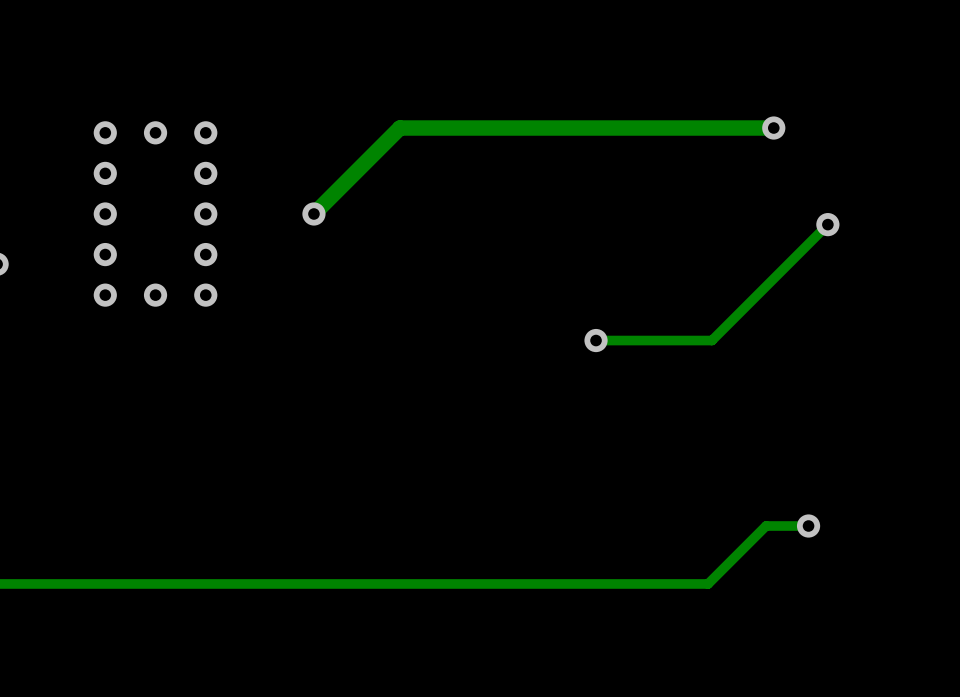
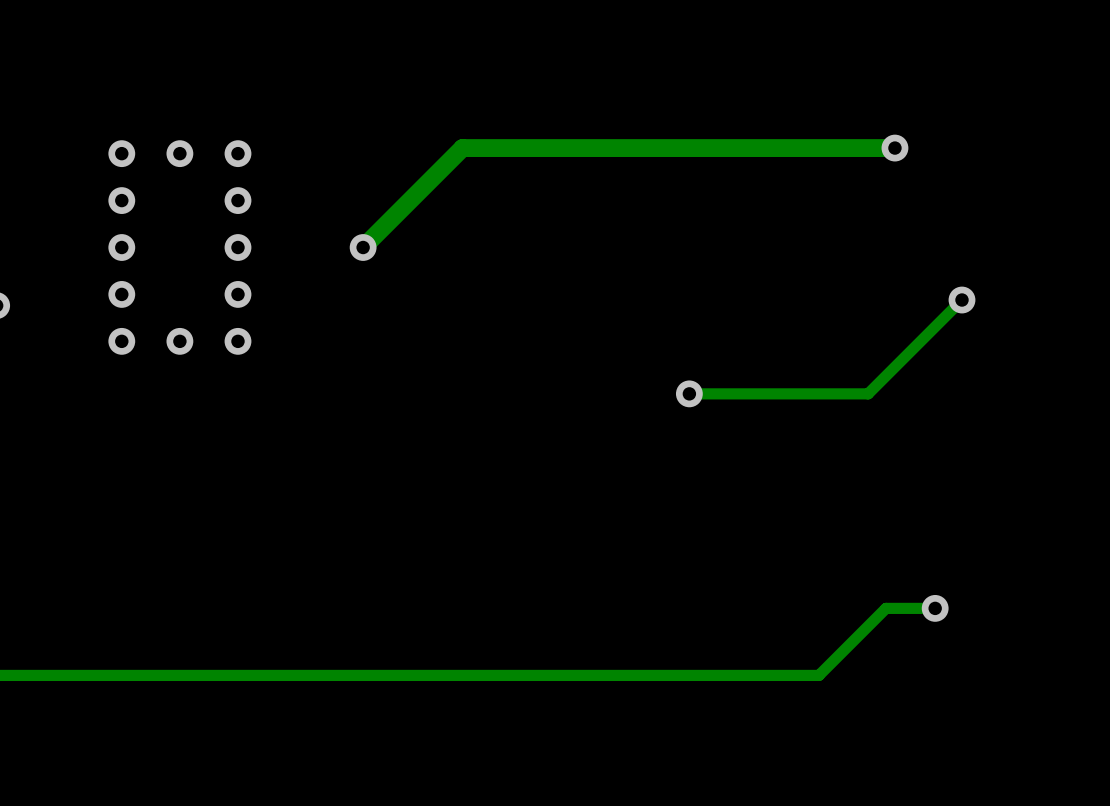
track: (827, 224) (711, 340) -> (961, 300) (868, 393) (823, 393)
via position: (827, 224) -> (961, 300)

